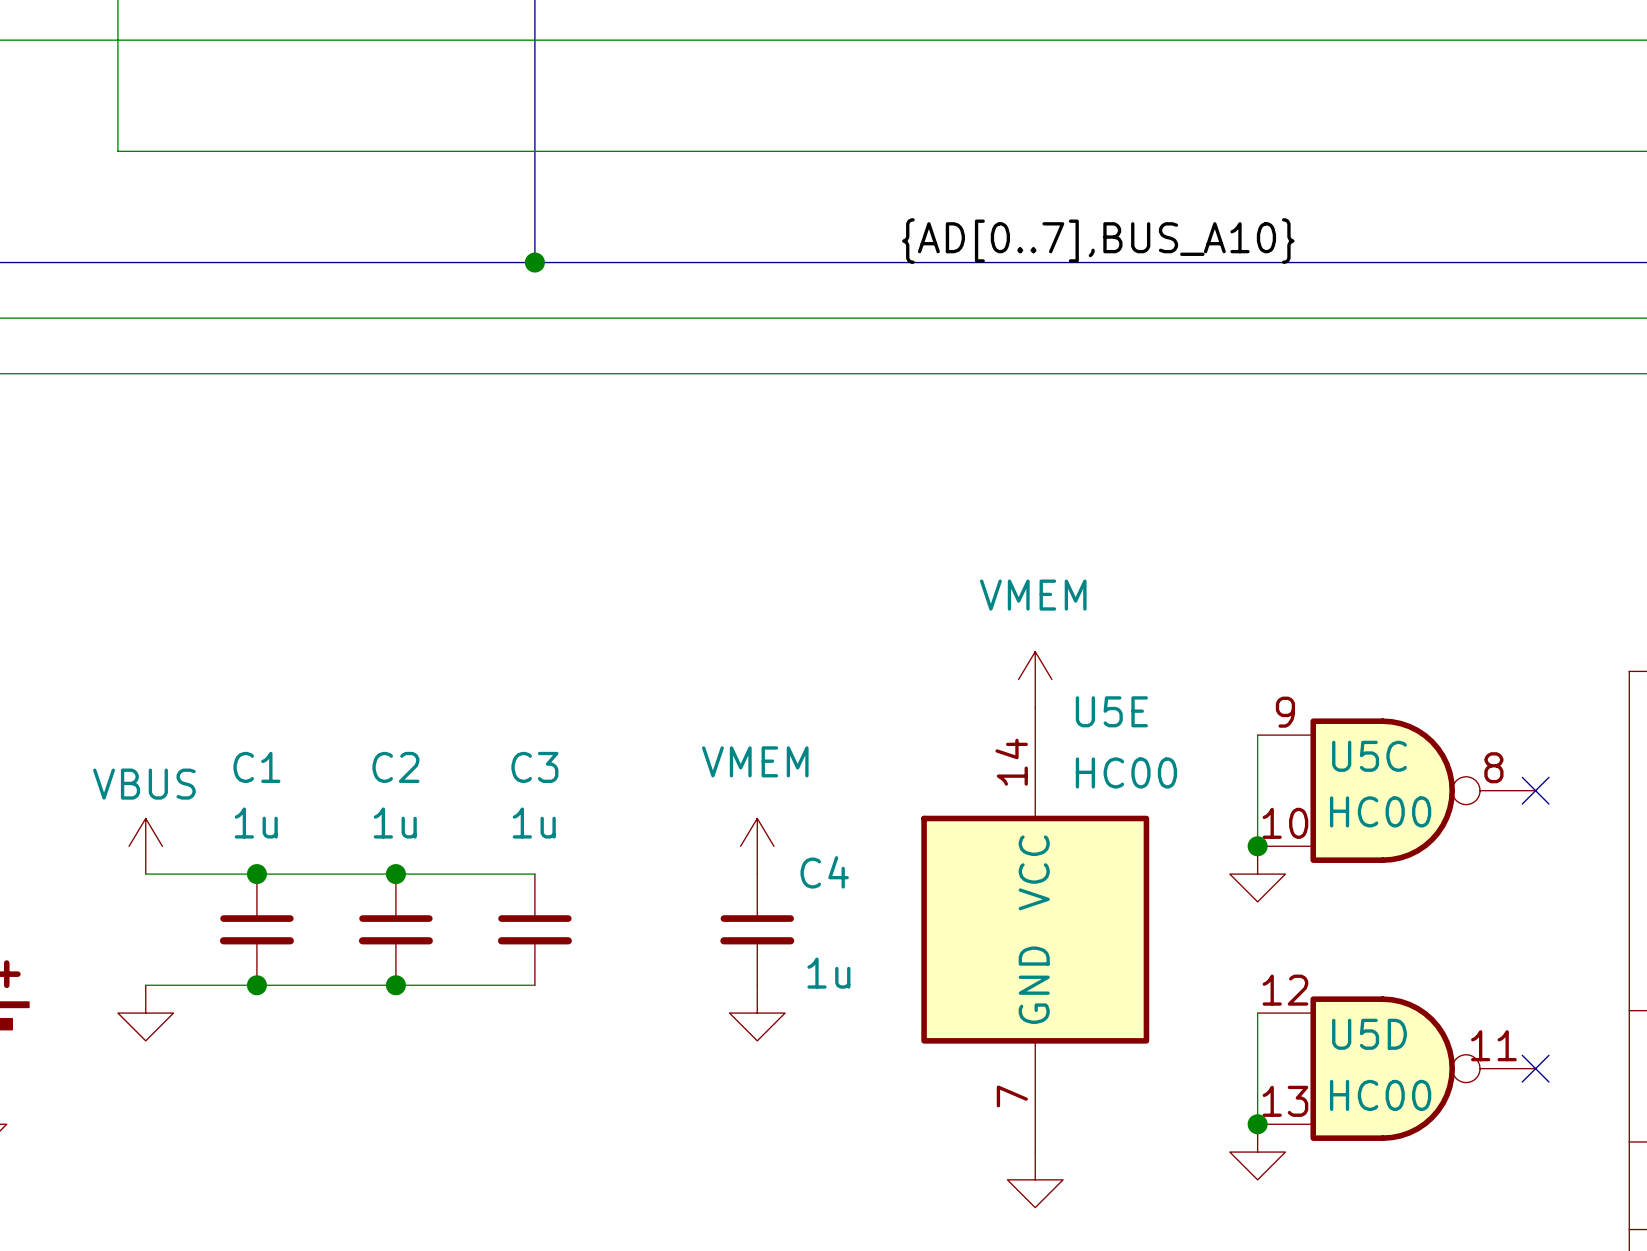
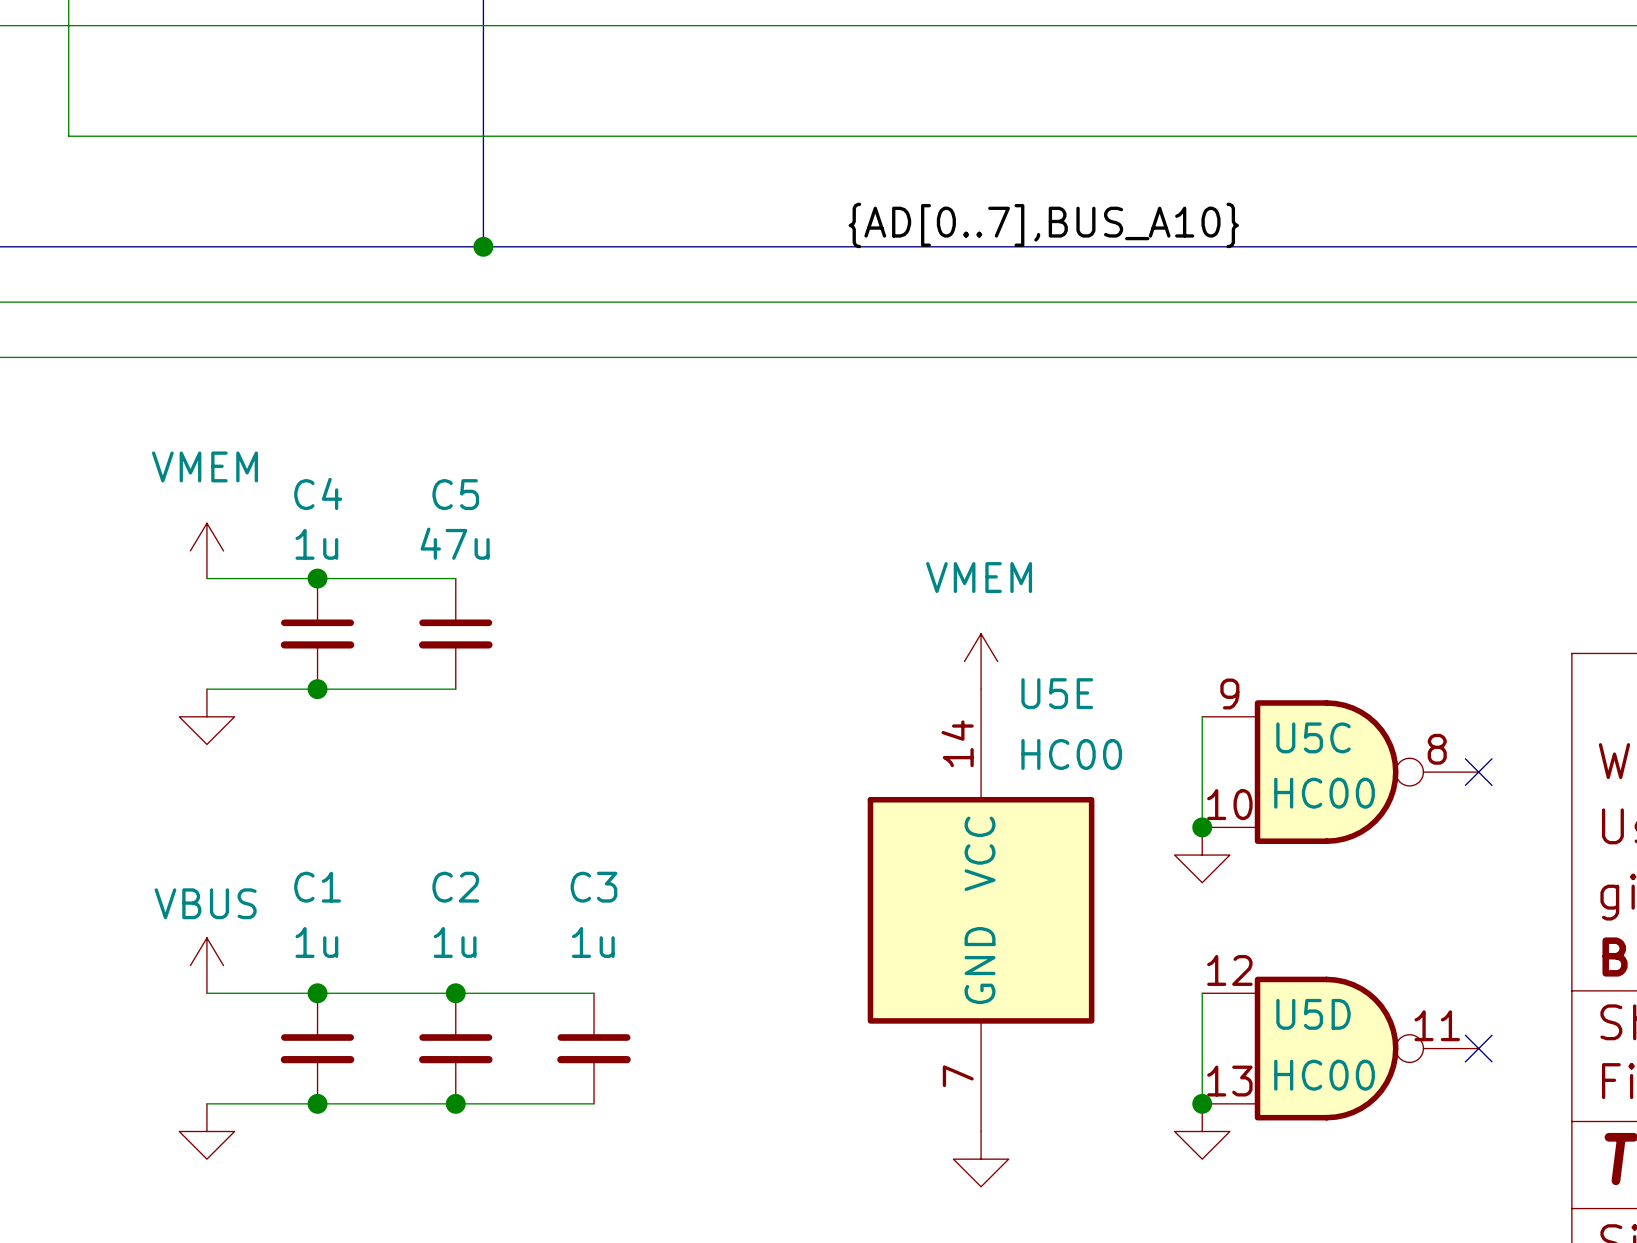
power symbol: none -> VMEM (206, 550)
wire: none -> (206, 578) (455, 578)
junction: none -> (317, 578)
C5: none -> 47u (455, 633)
wire: none -> (206, 689) (455, 689)
junction: none -> (317, 689)
power symbol: none -> (206, 716)
power symbol position: VBUS (145, 846) -> VBUS (206, 965)
power symbol: VMEM (757, 846) -> none
C4 name position: C4 (824, 872) -> C4 (318, 493)
wire: (145, 874) (534, 874) -> (206, 993) (594, 993)
junction: (256, 874) -> none
junction: (395, 874) -> none
C1 position: (256, 929) -> (317, 1048)
C2 position: (395, 929) -> (455, 1048)
C3 position: (534, 929) -> (594, 1048)
C4 position: (757, 929) -> (317, 633)
C4 value position: 1u (828, 973) -> 1u (316, 544)
wire: (145, 985) (534, 985) -> (206, 1103) (594, 1103)
junction: (256, 985) -> none
junction position: (395, 985) -> (317, 993)
power symbol: (145, 1013) -> none
junction: none -> (455, 993)
power symbol: (757, 1013) -> none
junction: none -> (317, 1103)
junction: none -> (455, 1103)
power symbol: none -> (206, 1131)

